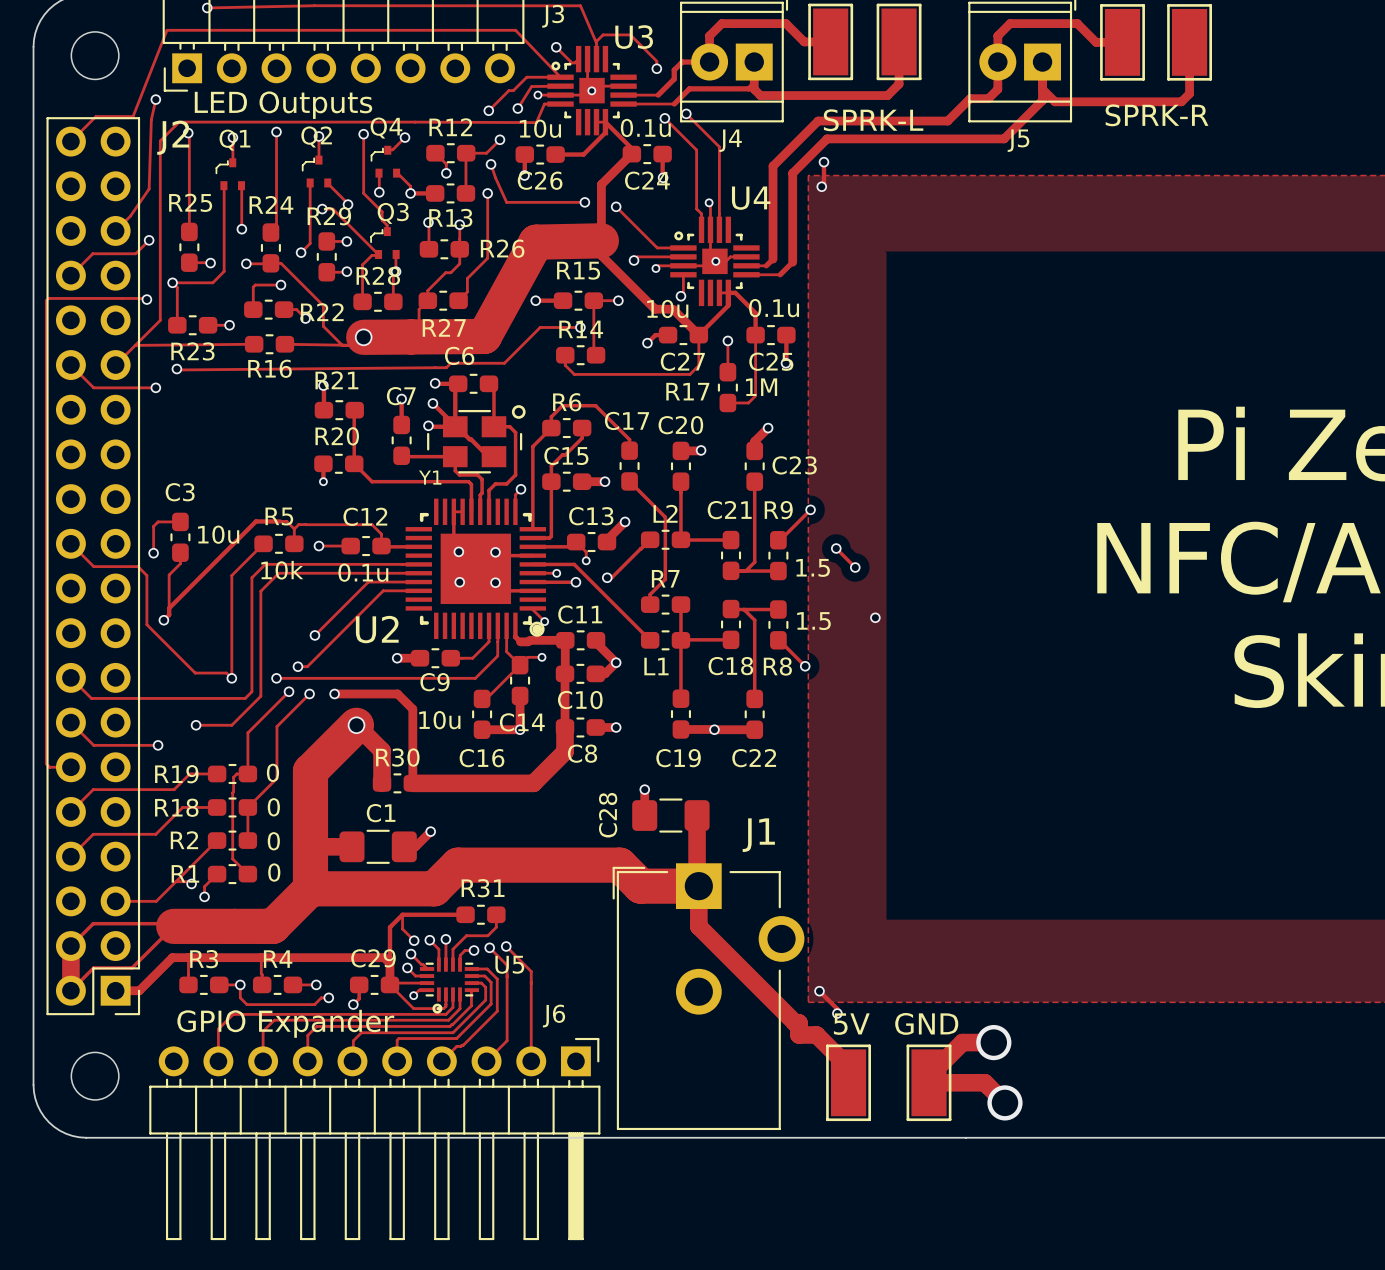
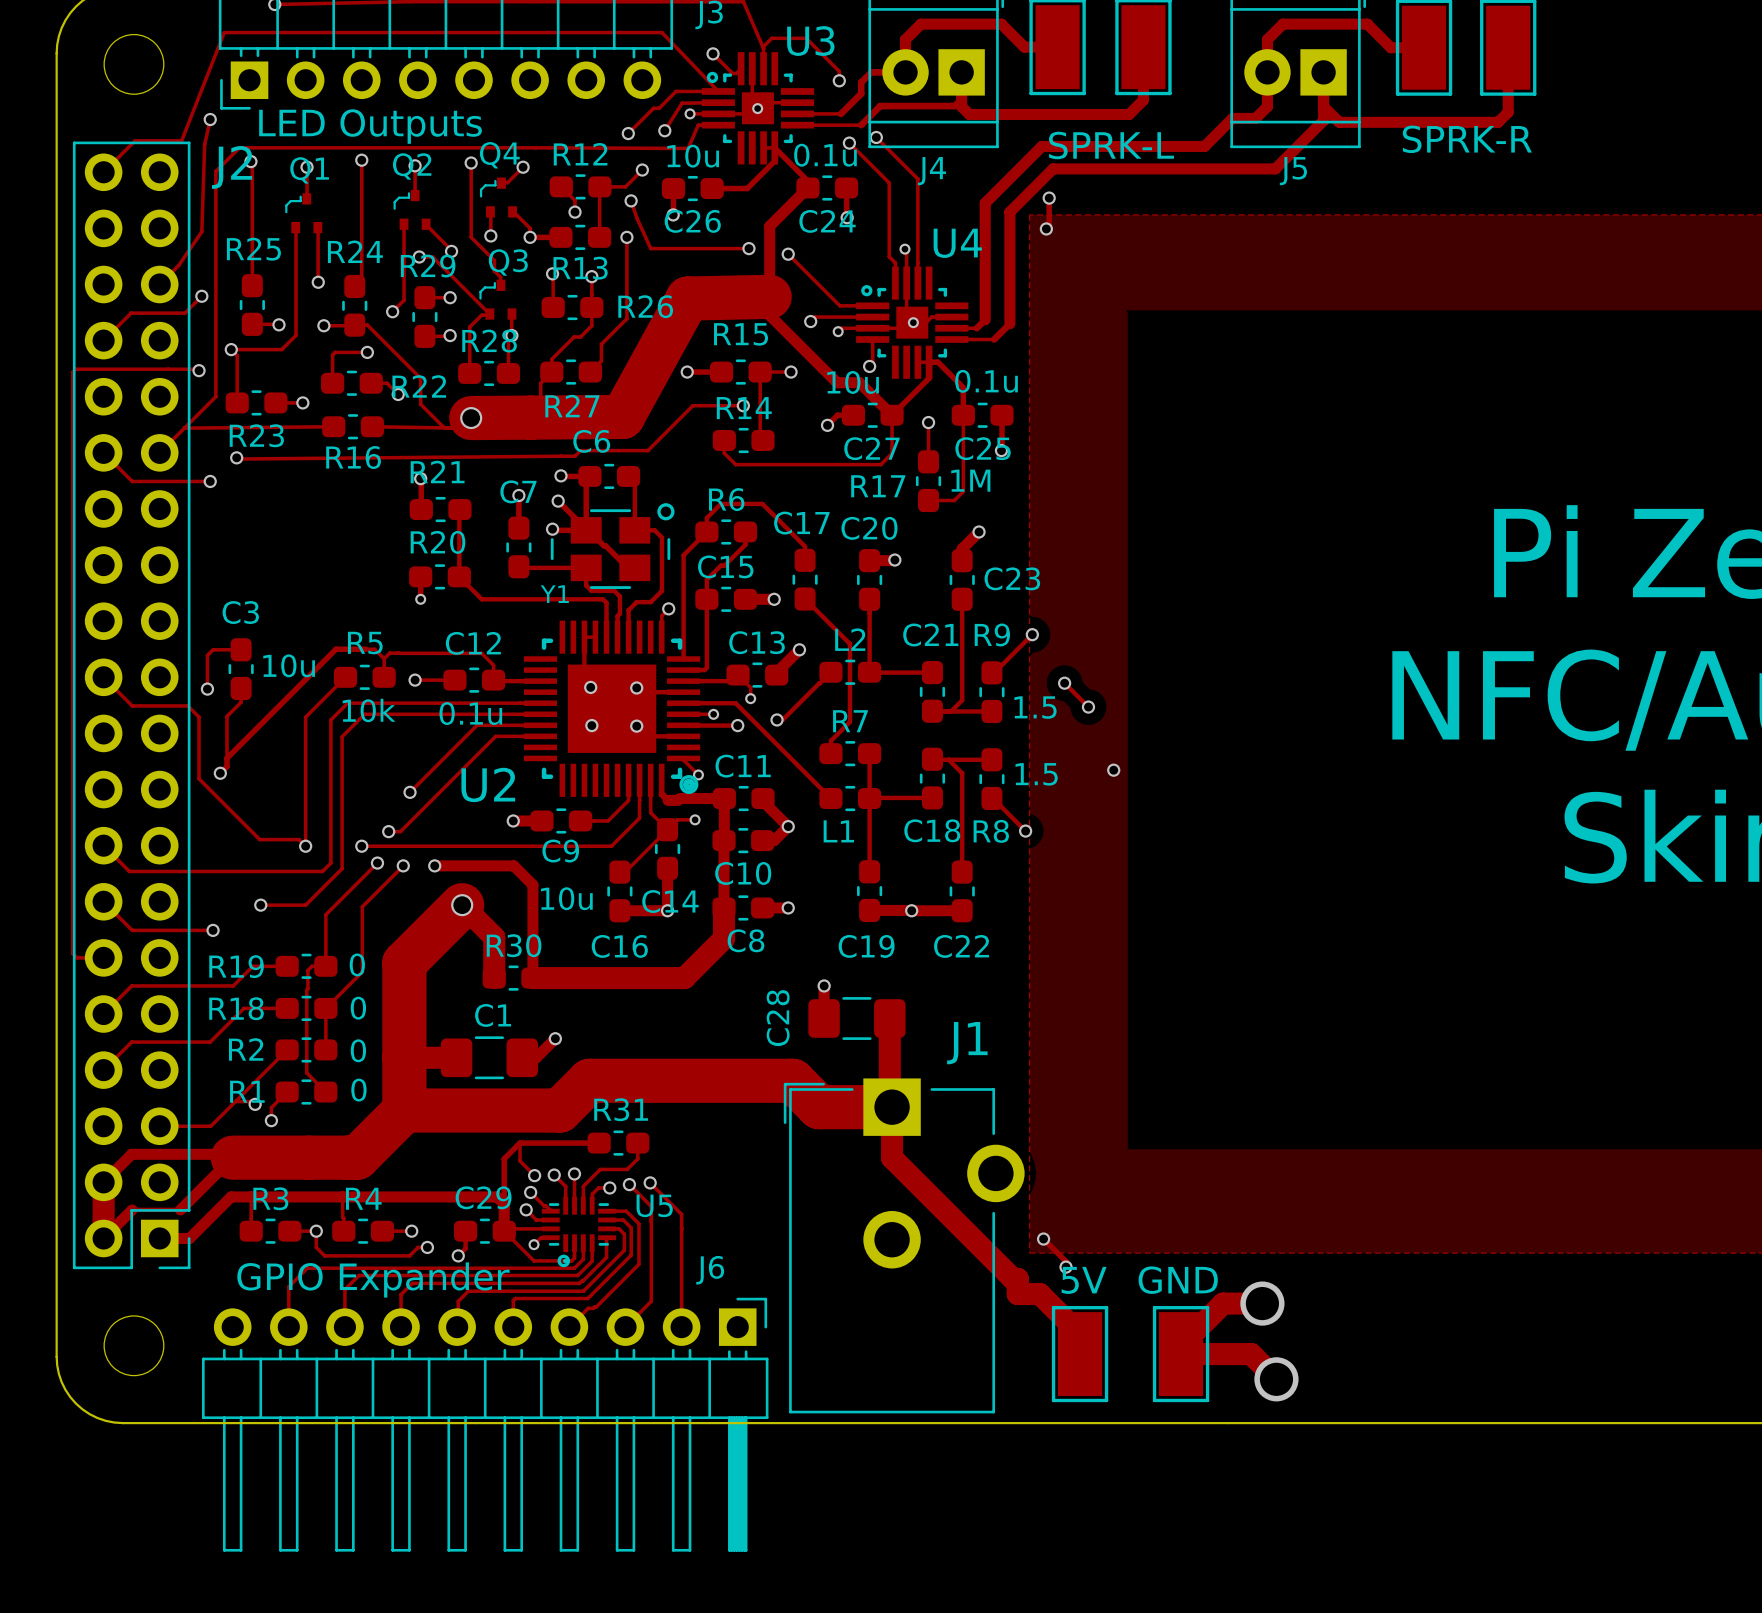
track width: thin (171, 923) (93, 923) (70, 946) -> thick (229, 1154) (131, 1154) (103, 1182)
track width: thin (173, 926) (132, 967) -> thick (232, 1157) (180, 1209)
track width: thin (93, 967) (70, 990) -> thick (132, 1209) (103, 1238)

